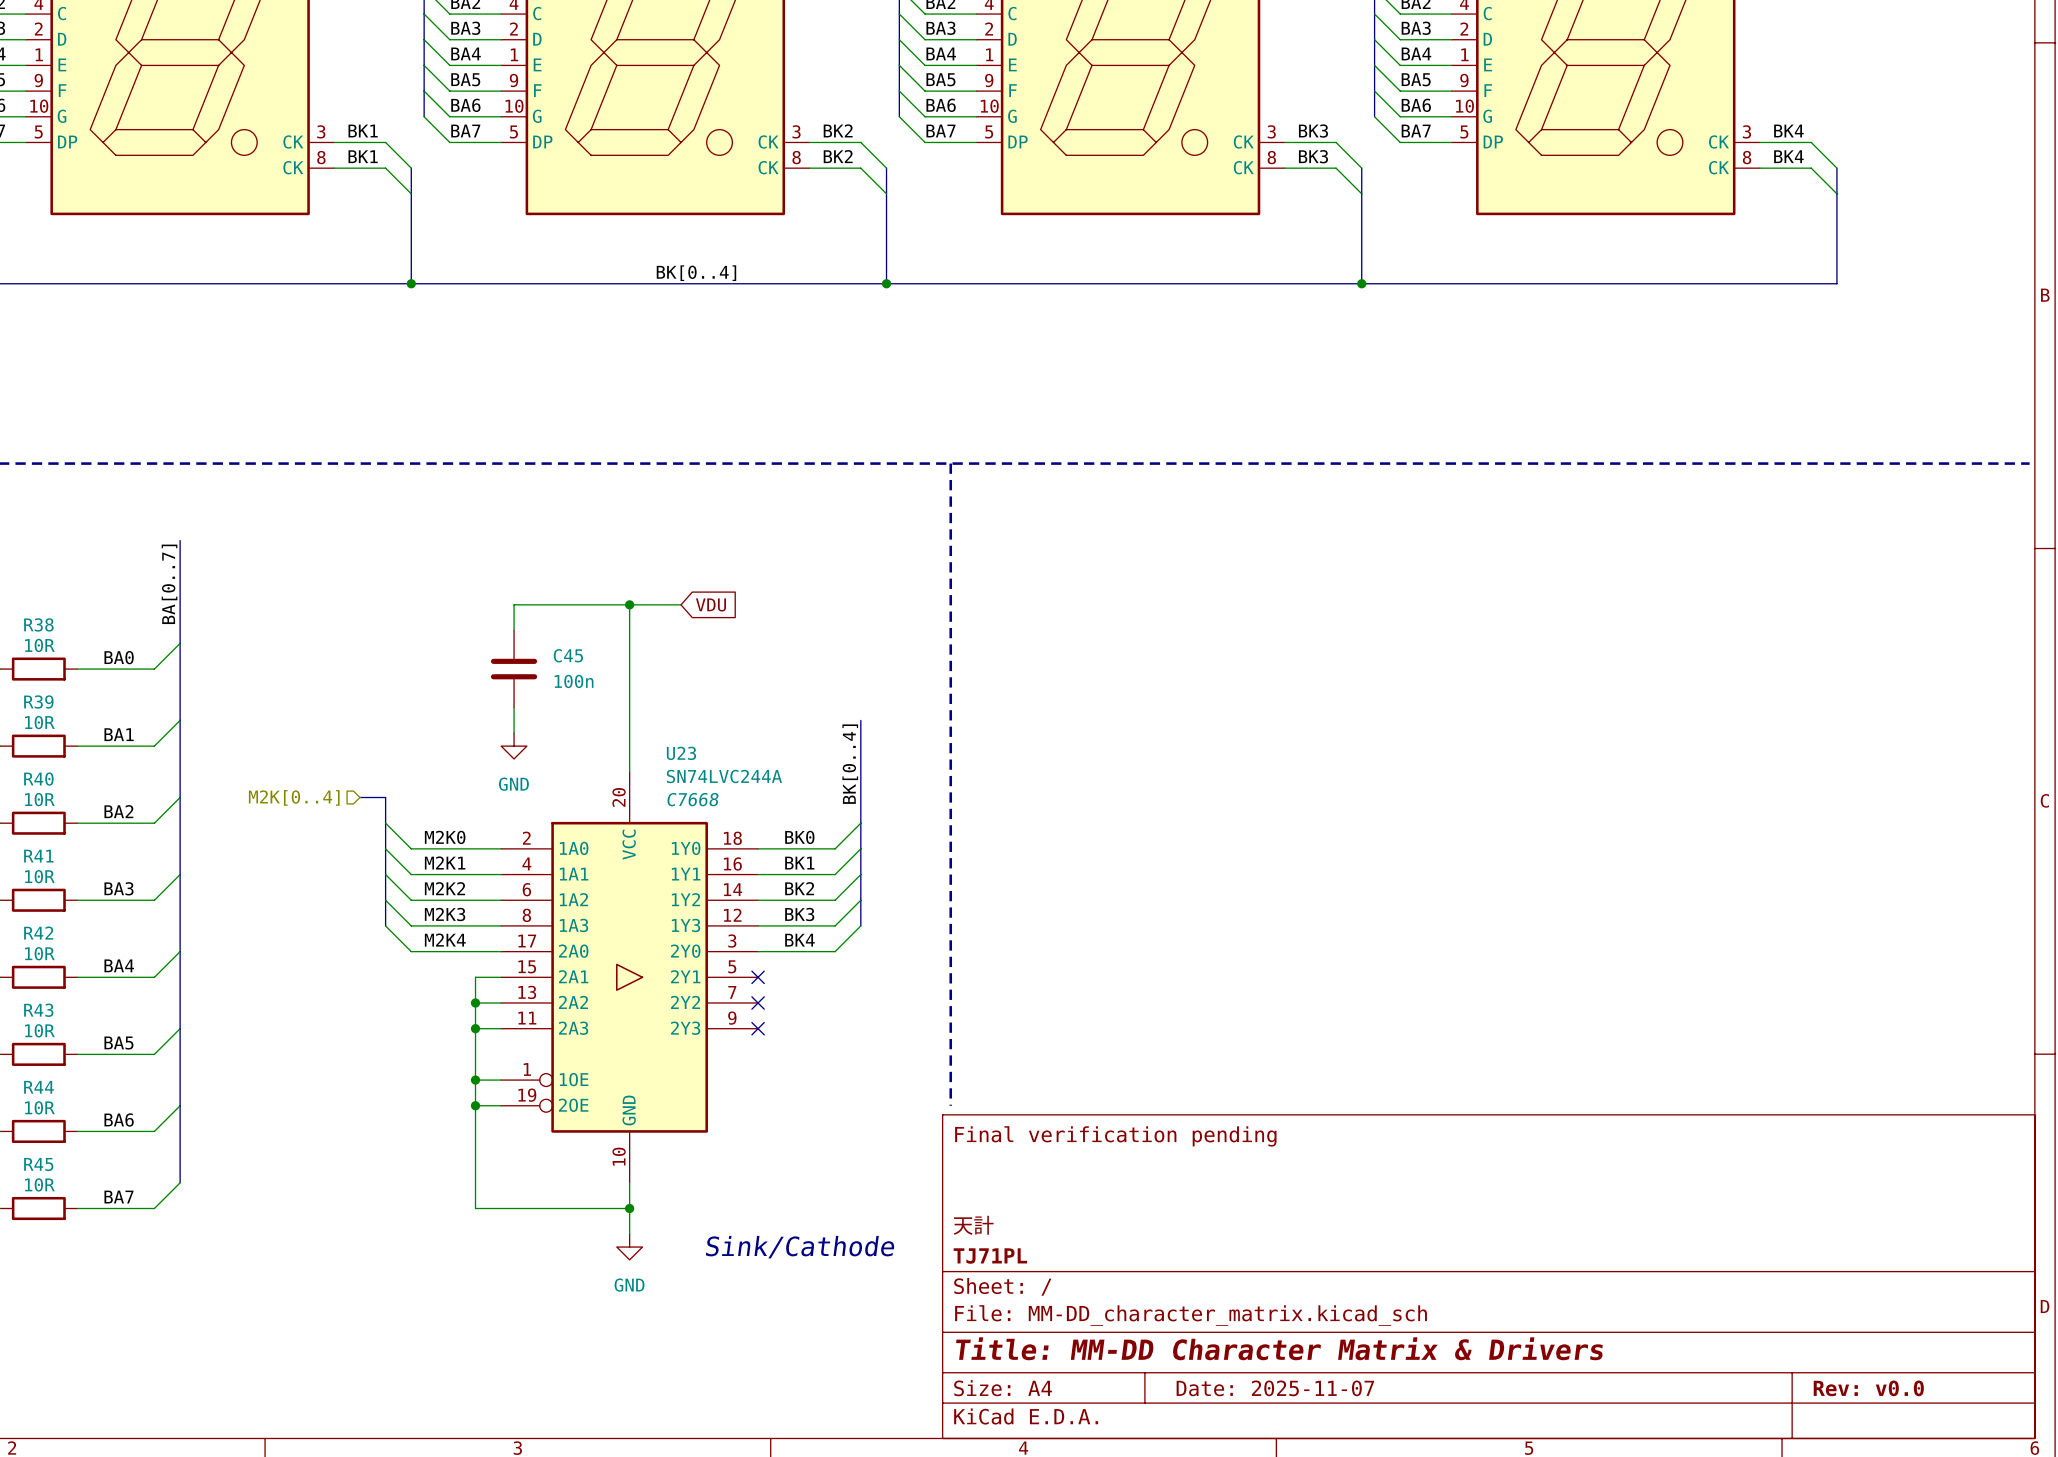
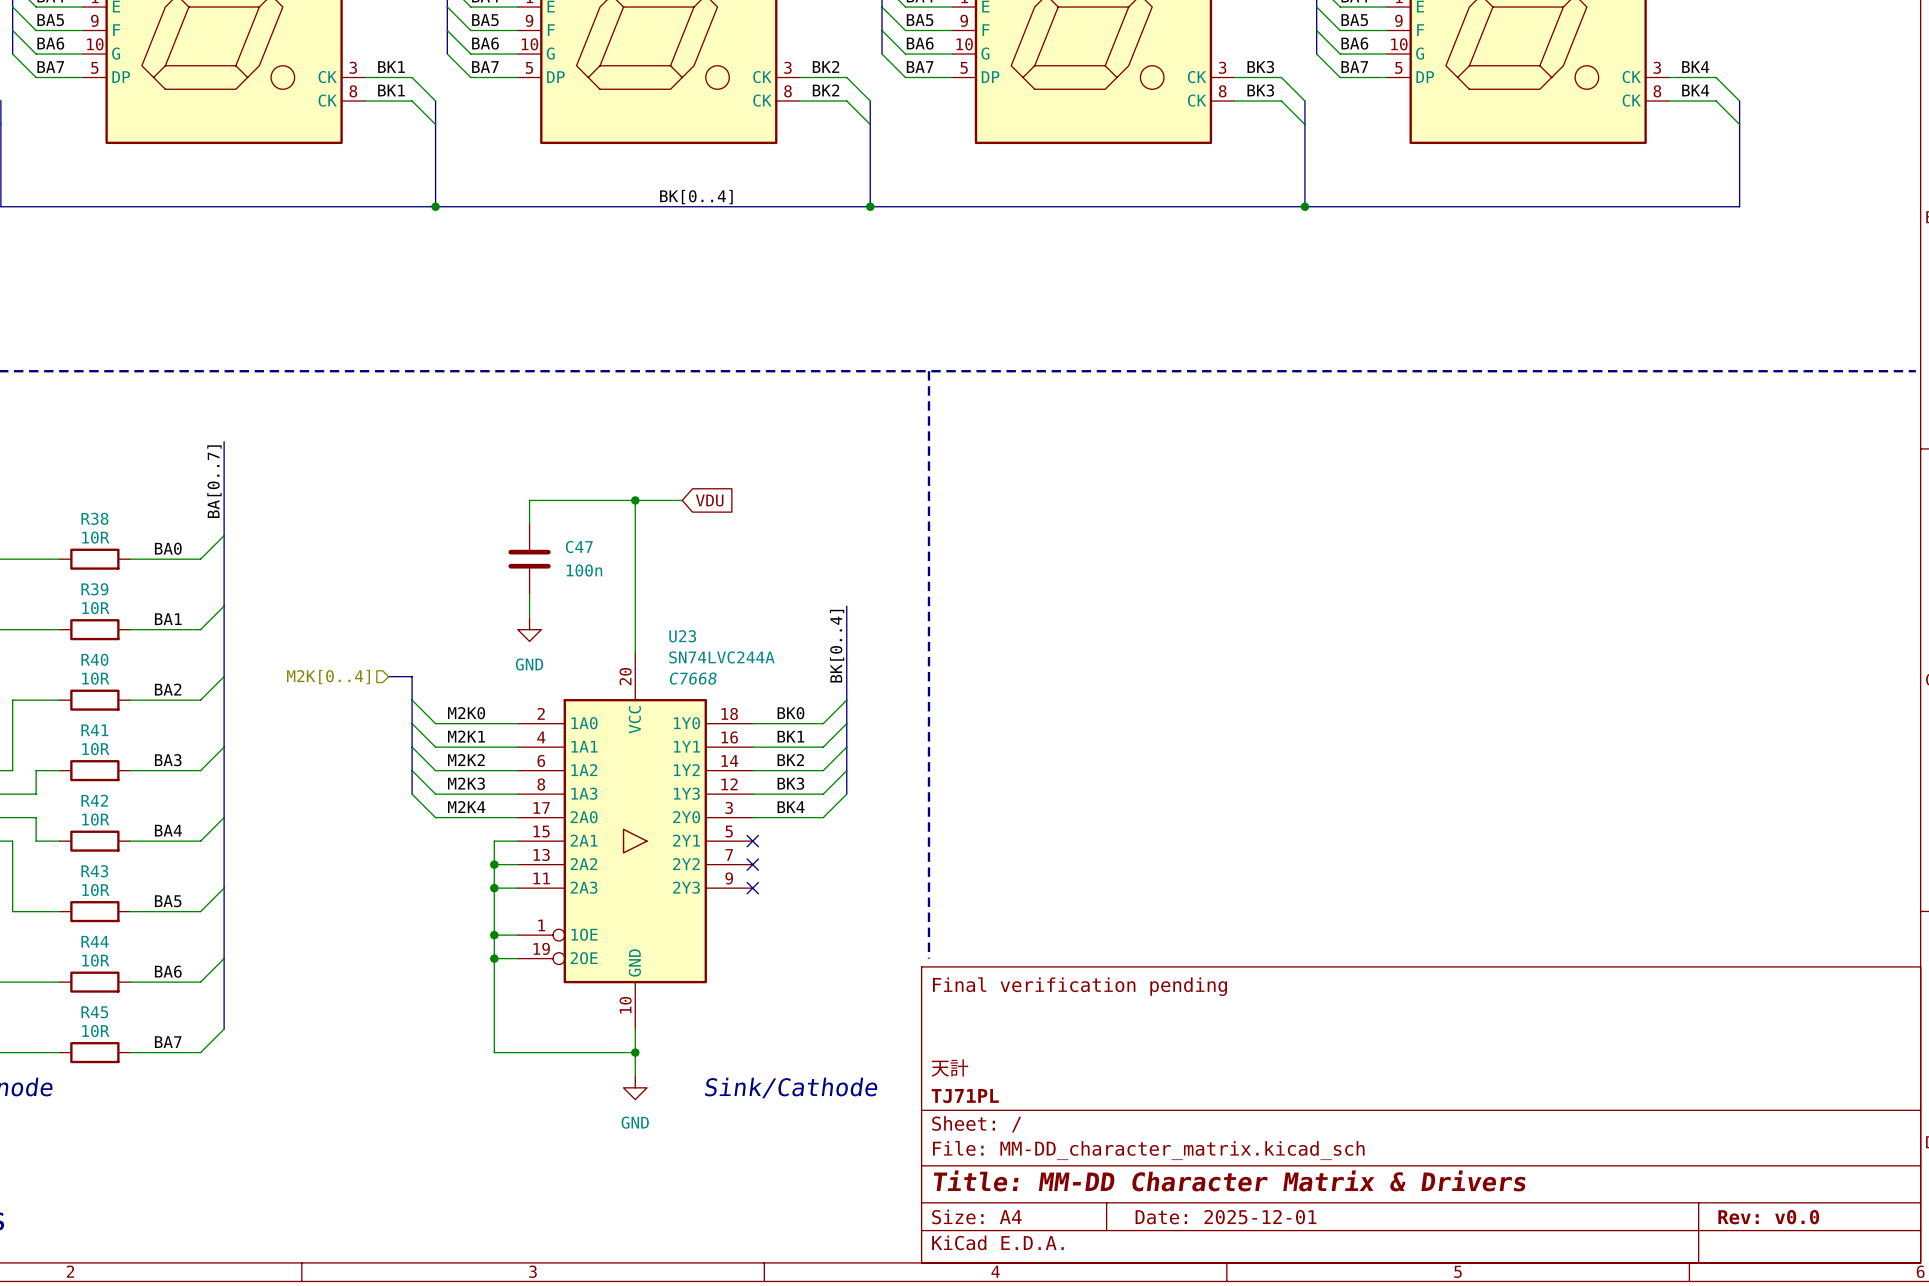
C45 name: C45 (568, 655) -> C47 (579, 547)
title block: Date: 2025-11-07 (1275, 1388) -> Date: 2025-12-01 (1226, 1217)

